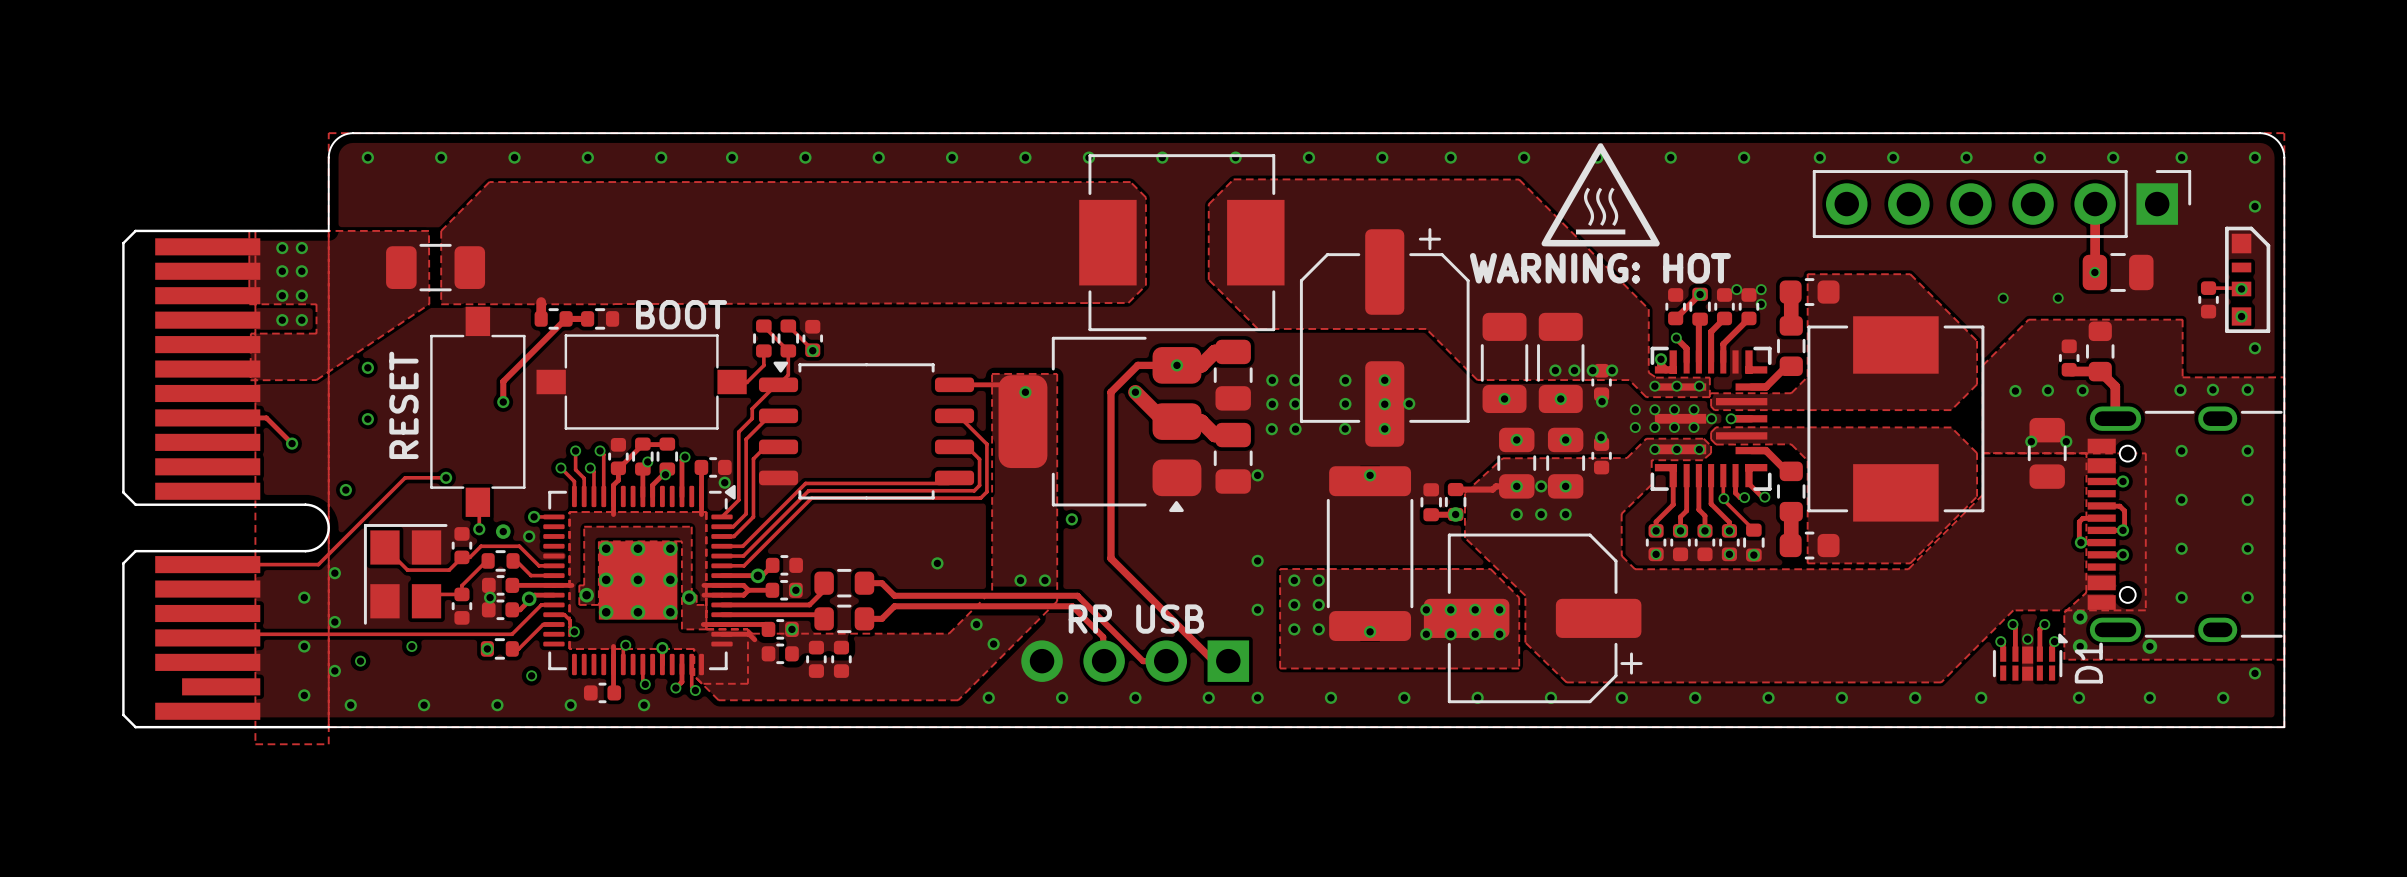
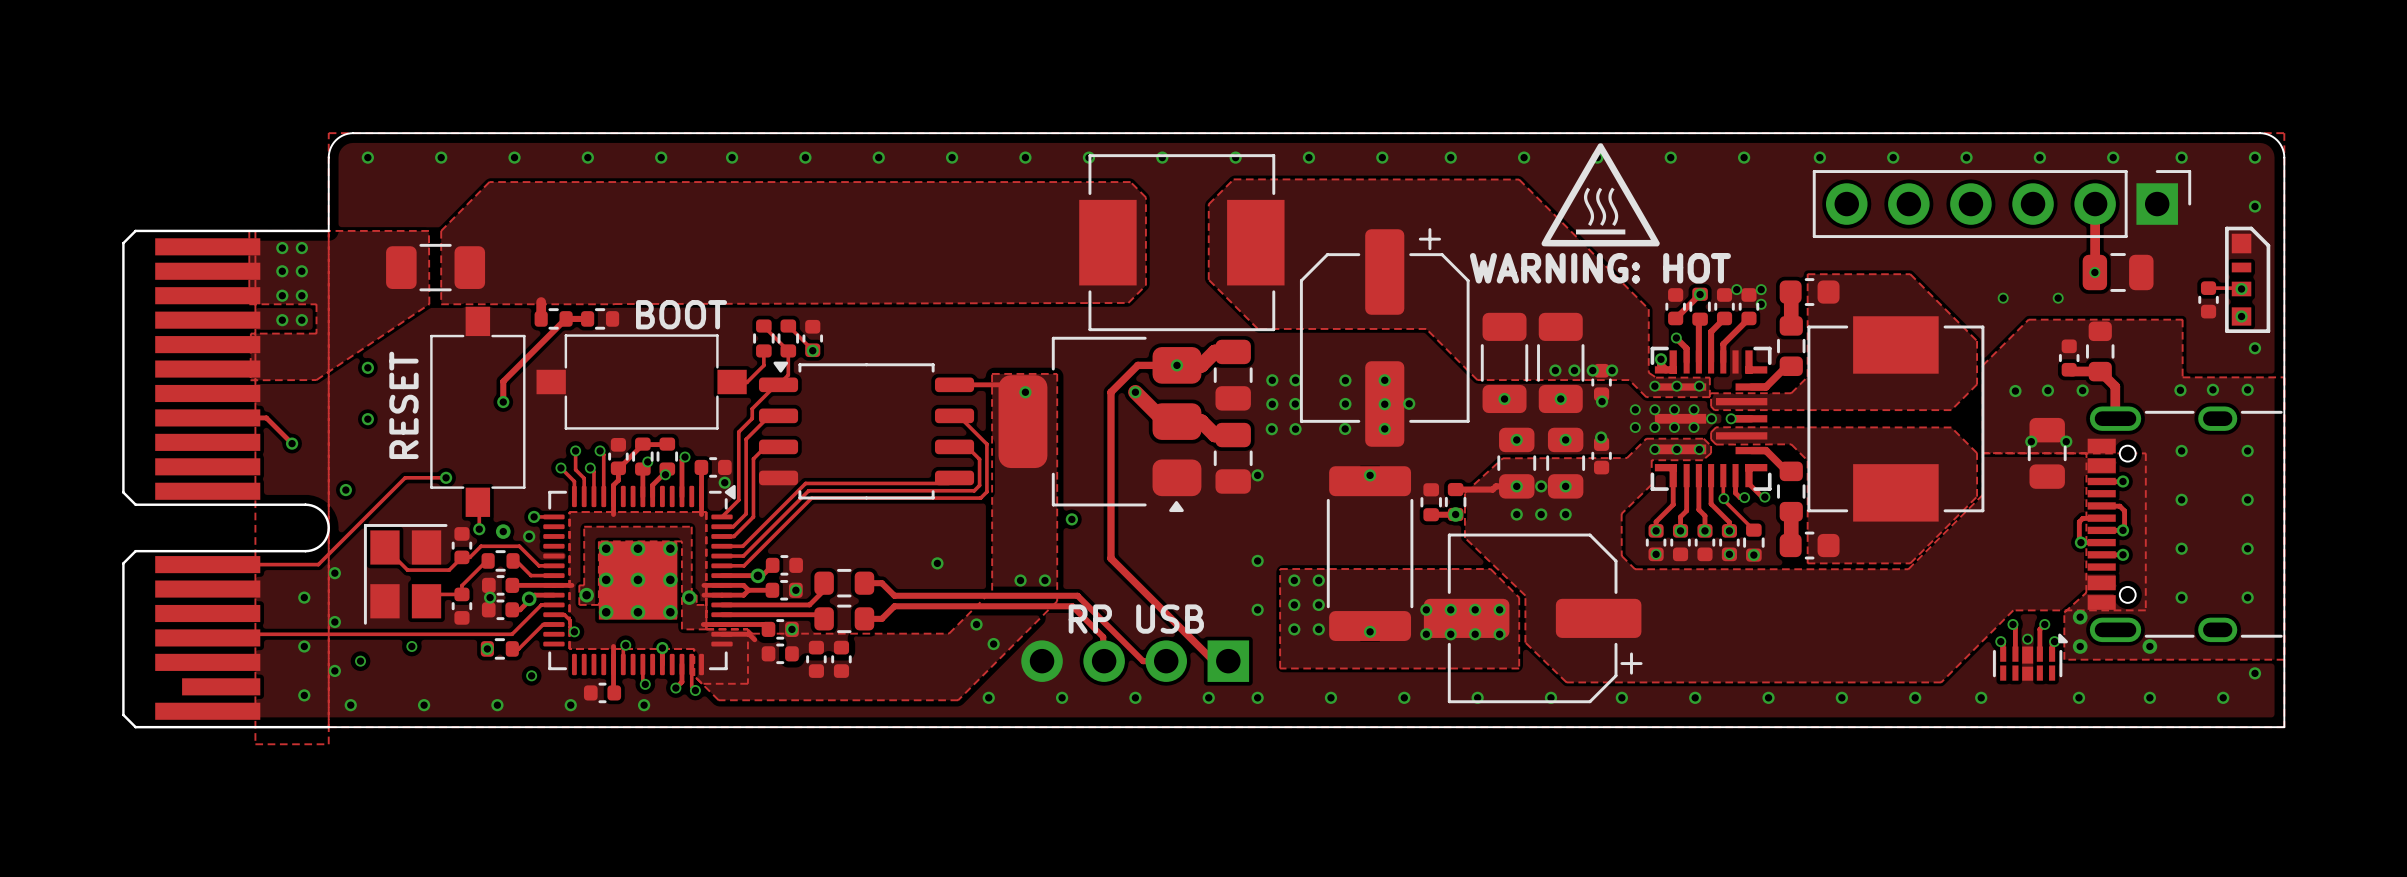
D1 name: D1 (2088, 663) -> none

